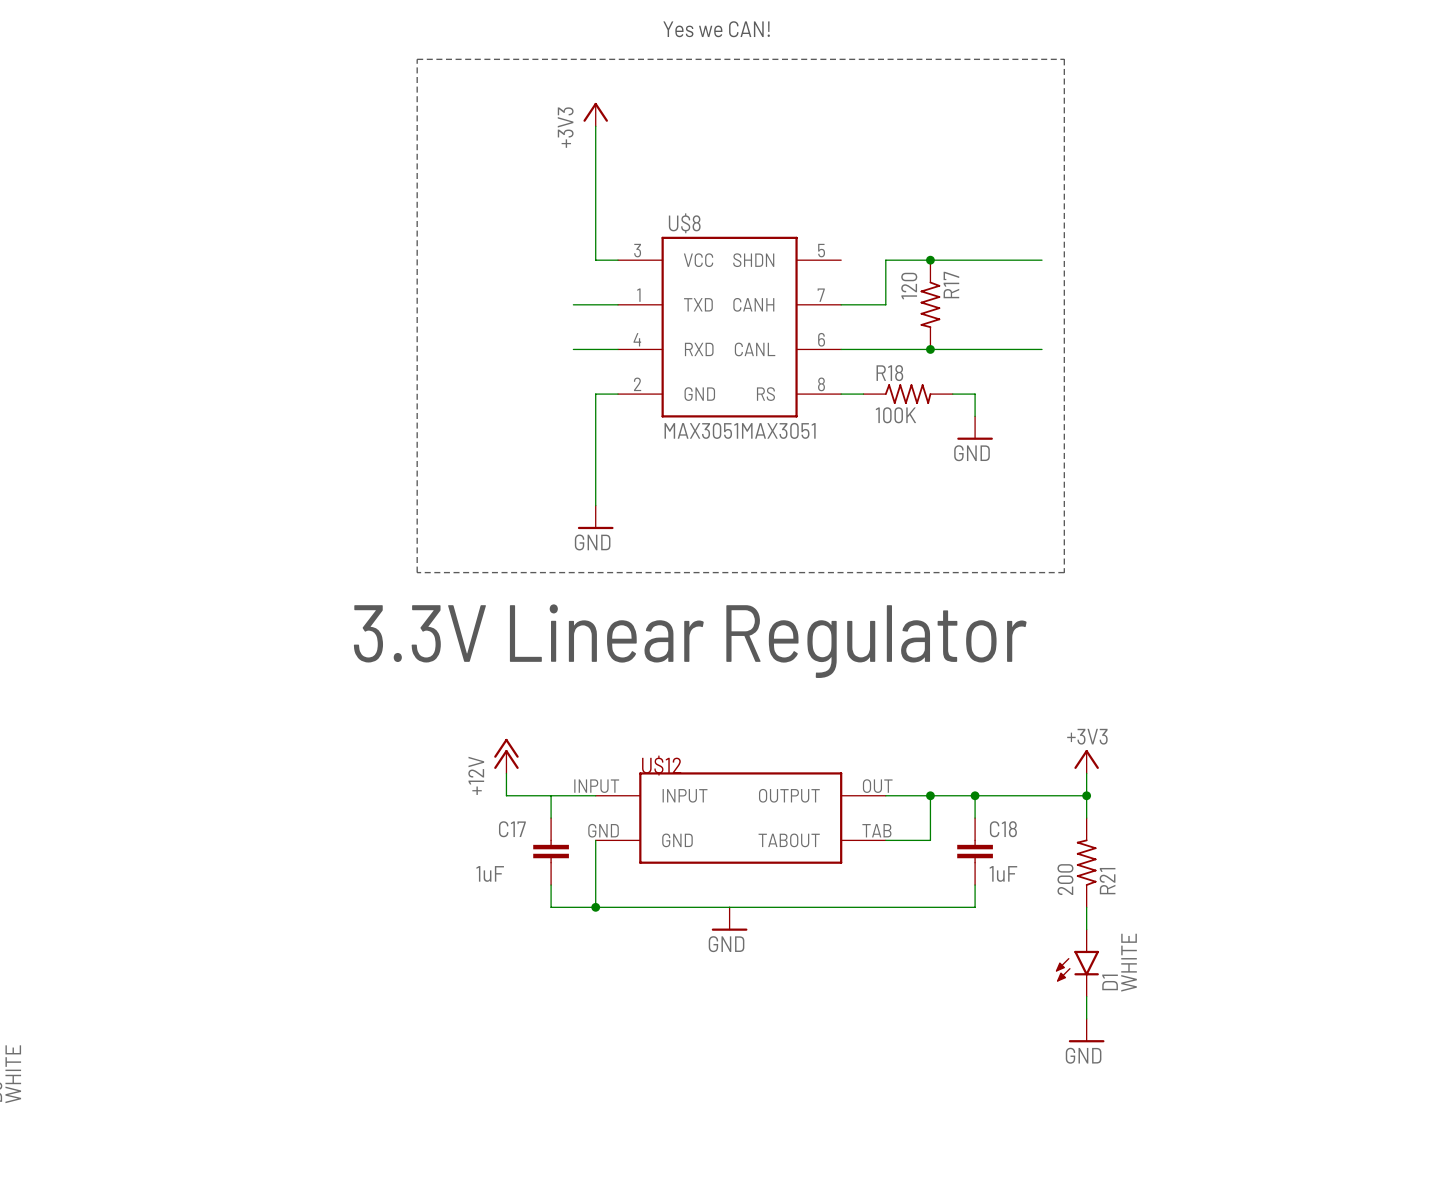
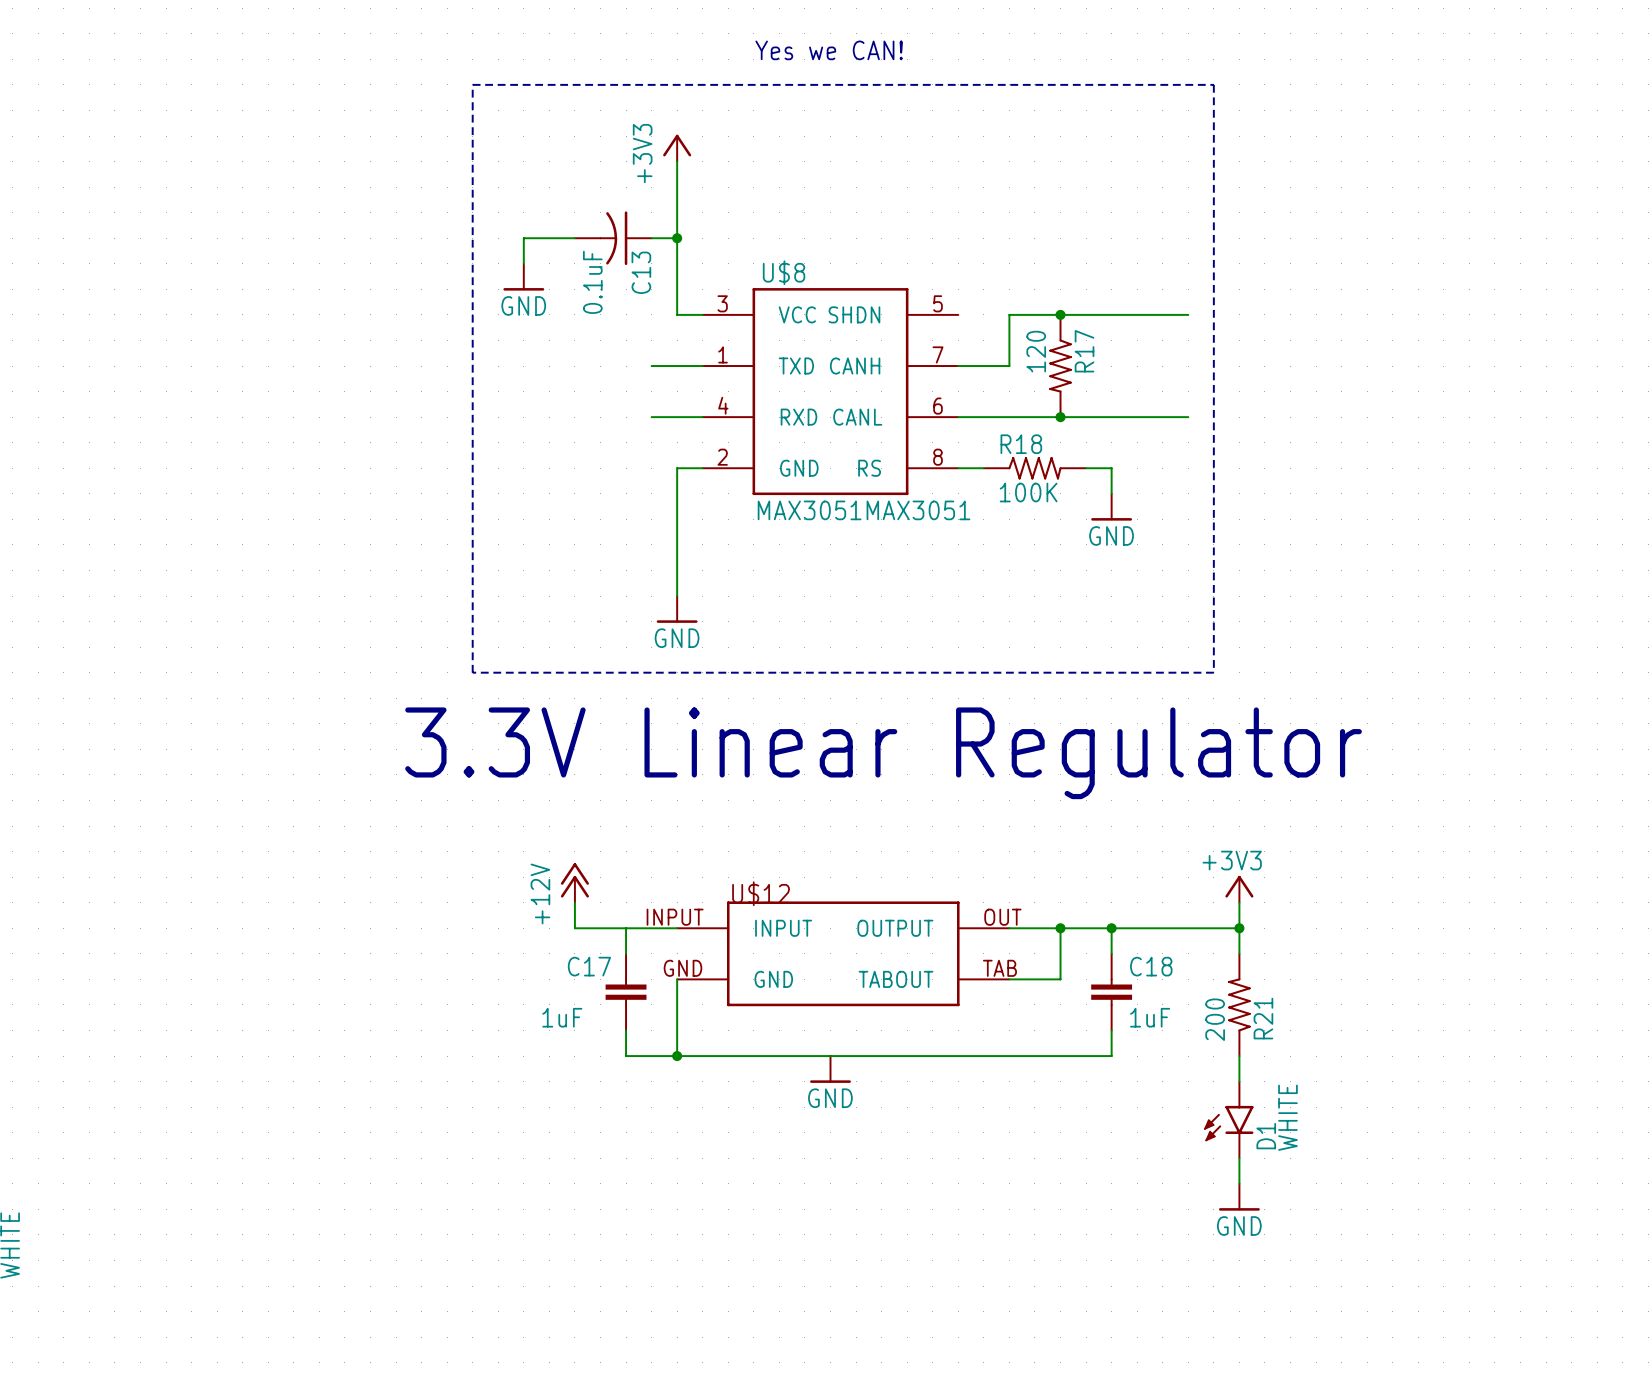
wire: none -> (574, 238) (523, 238) (523, 263)
C13: none -> 0.1uF (613, 238)
wire: none -> (651, 238) (677, 238)
junction: none -> (677, 238)
power symbol: none -> GND (523, 277)

